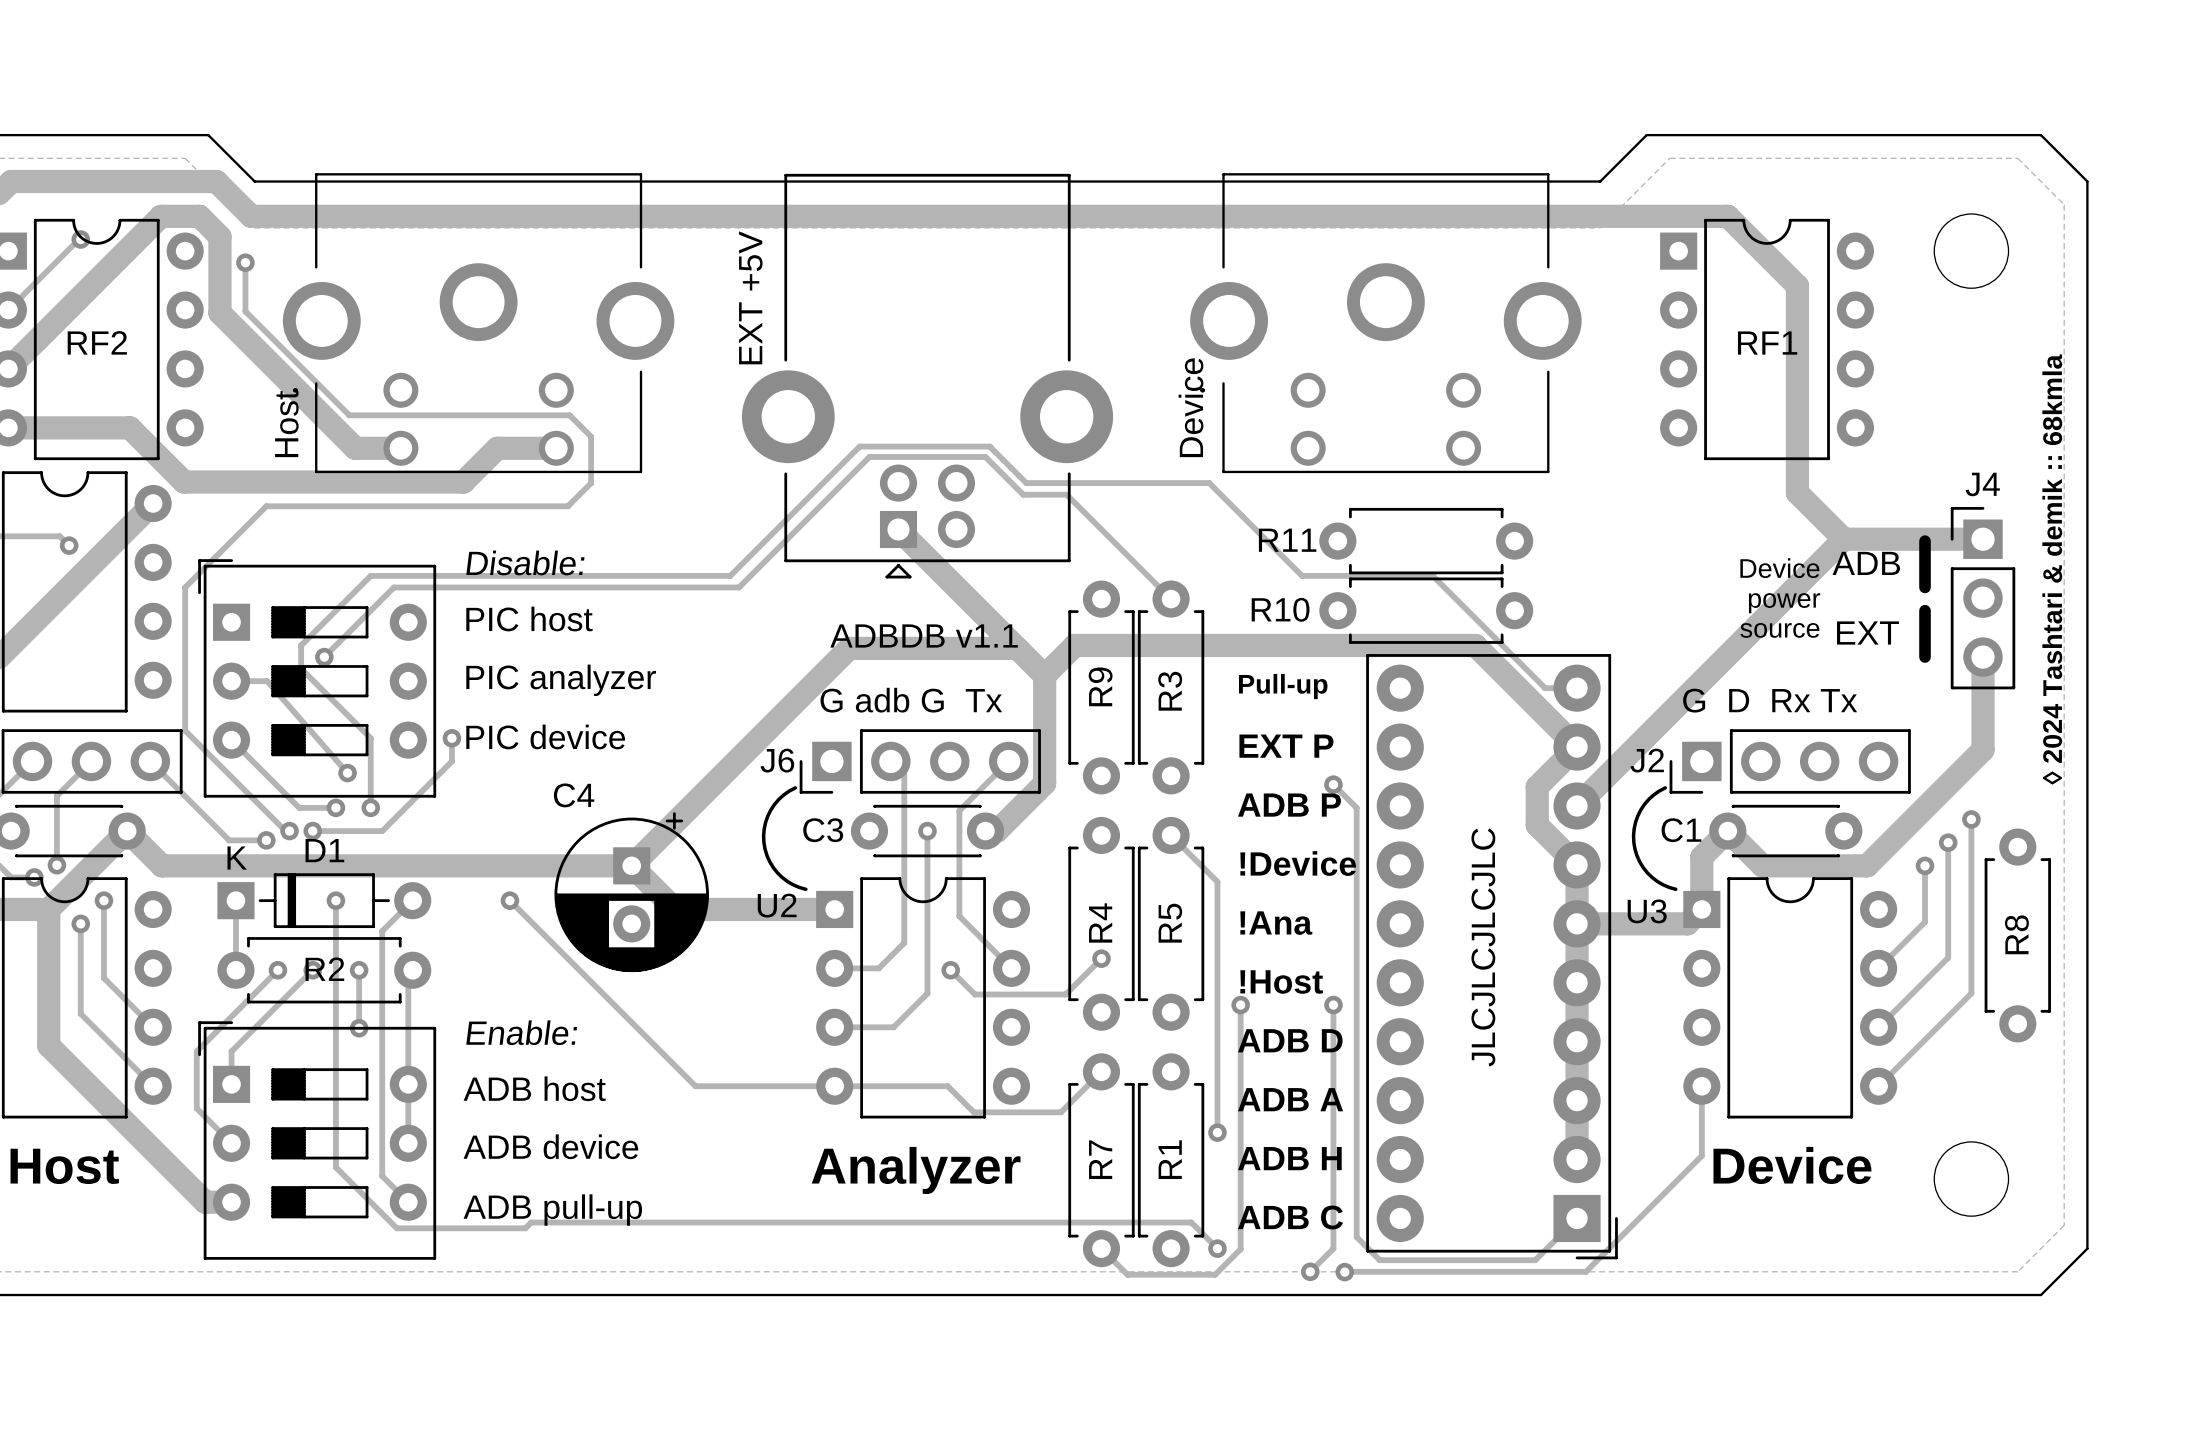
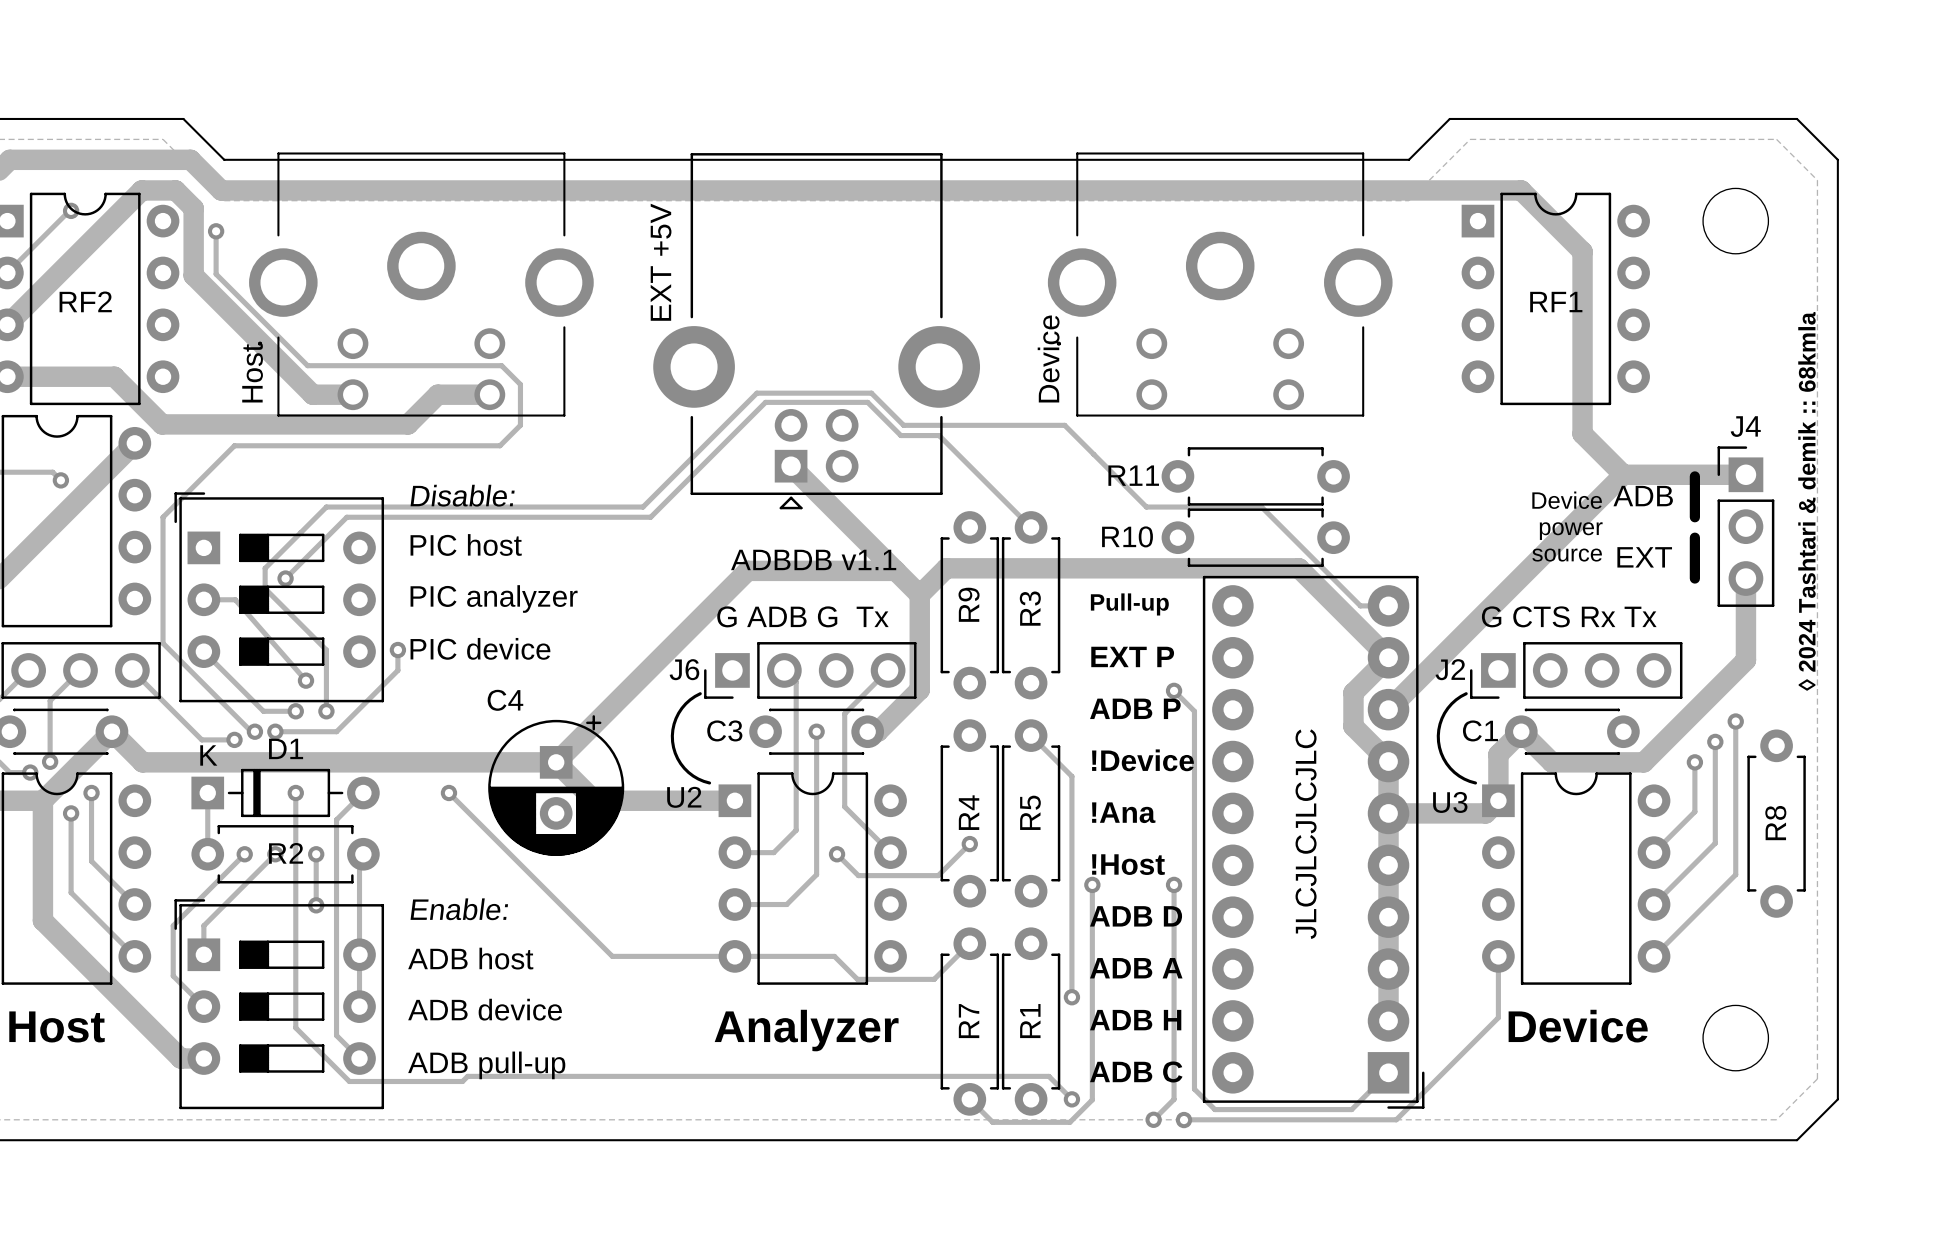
text: G adb G Tx (911, 700) -> G ADB G Tx (802, 616)
text: G D Rx Tx (1770, 700) -> G CTS Rx Tx (1569, 616)

